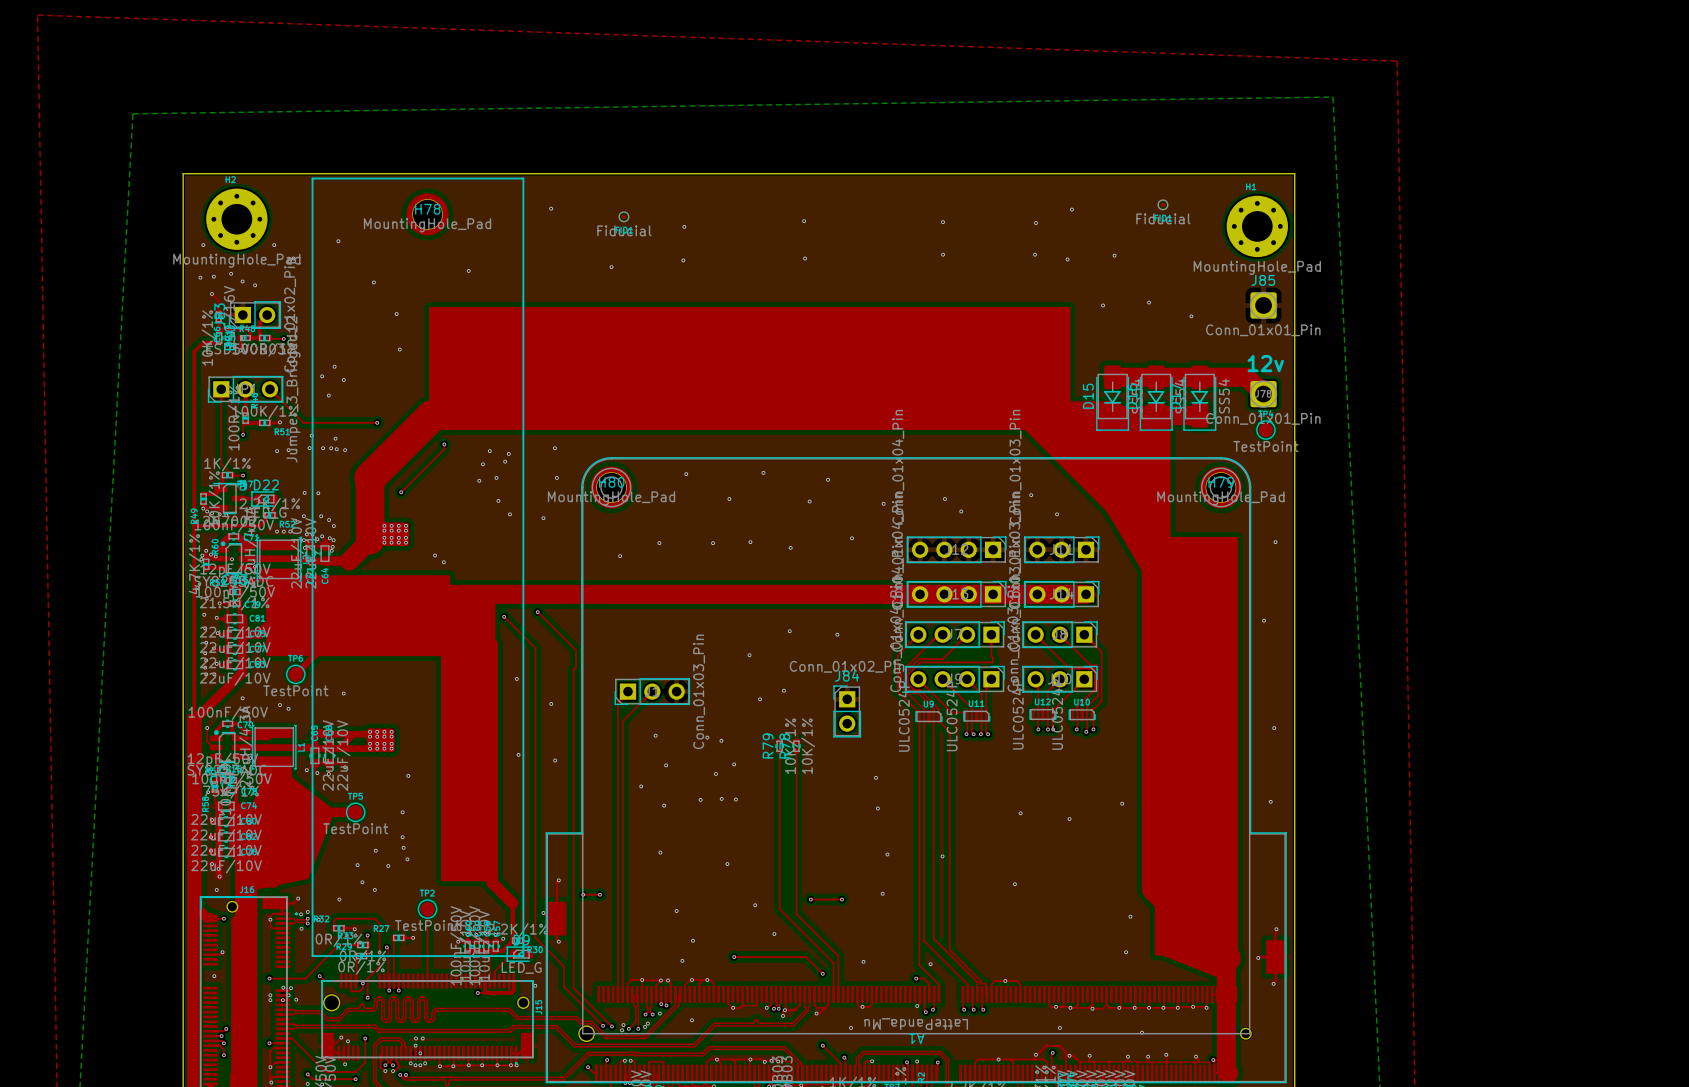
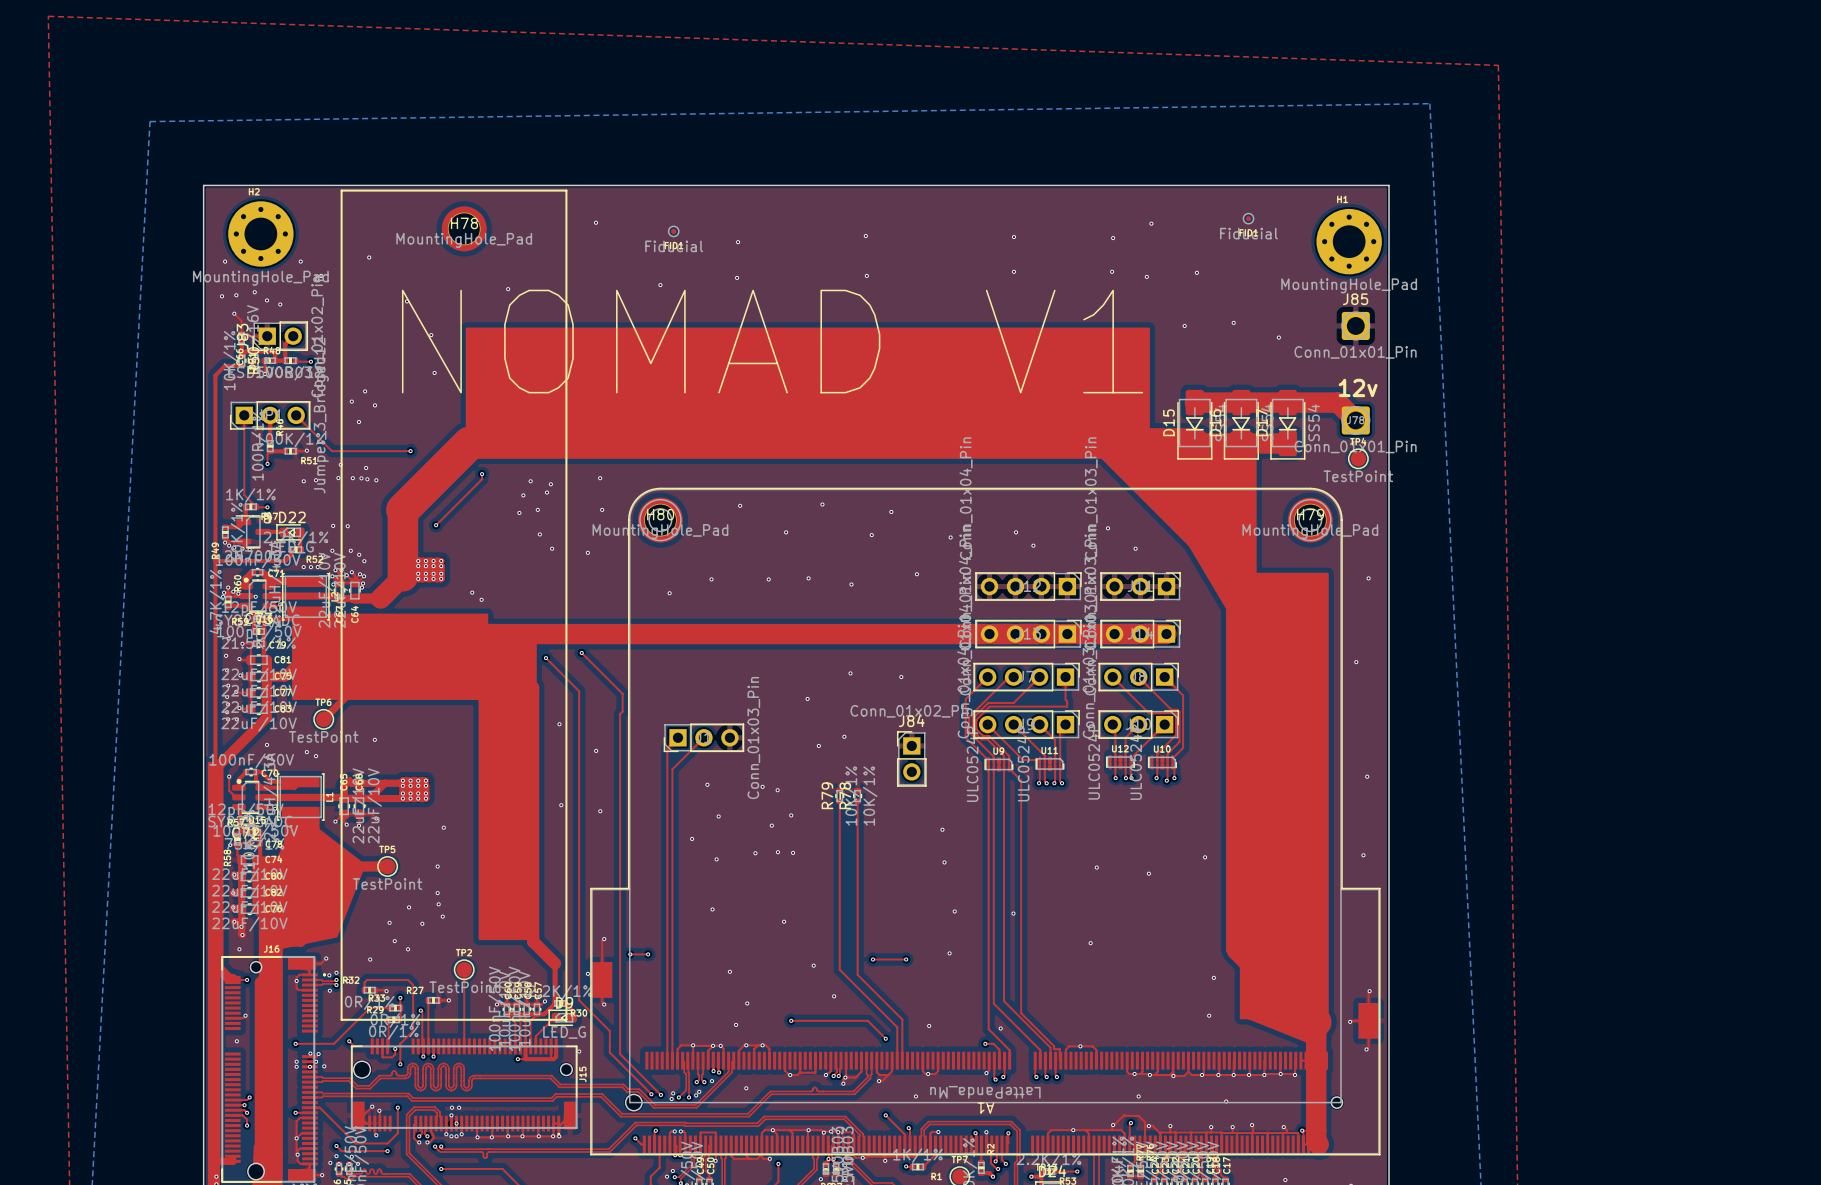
text: none -> NOMAD V1 (772, 341)

